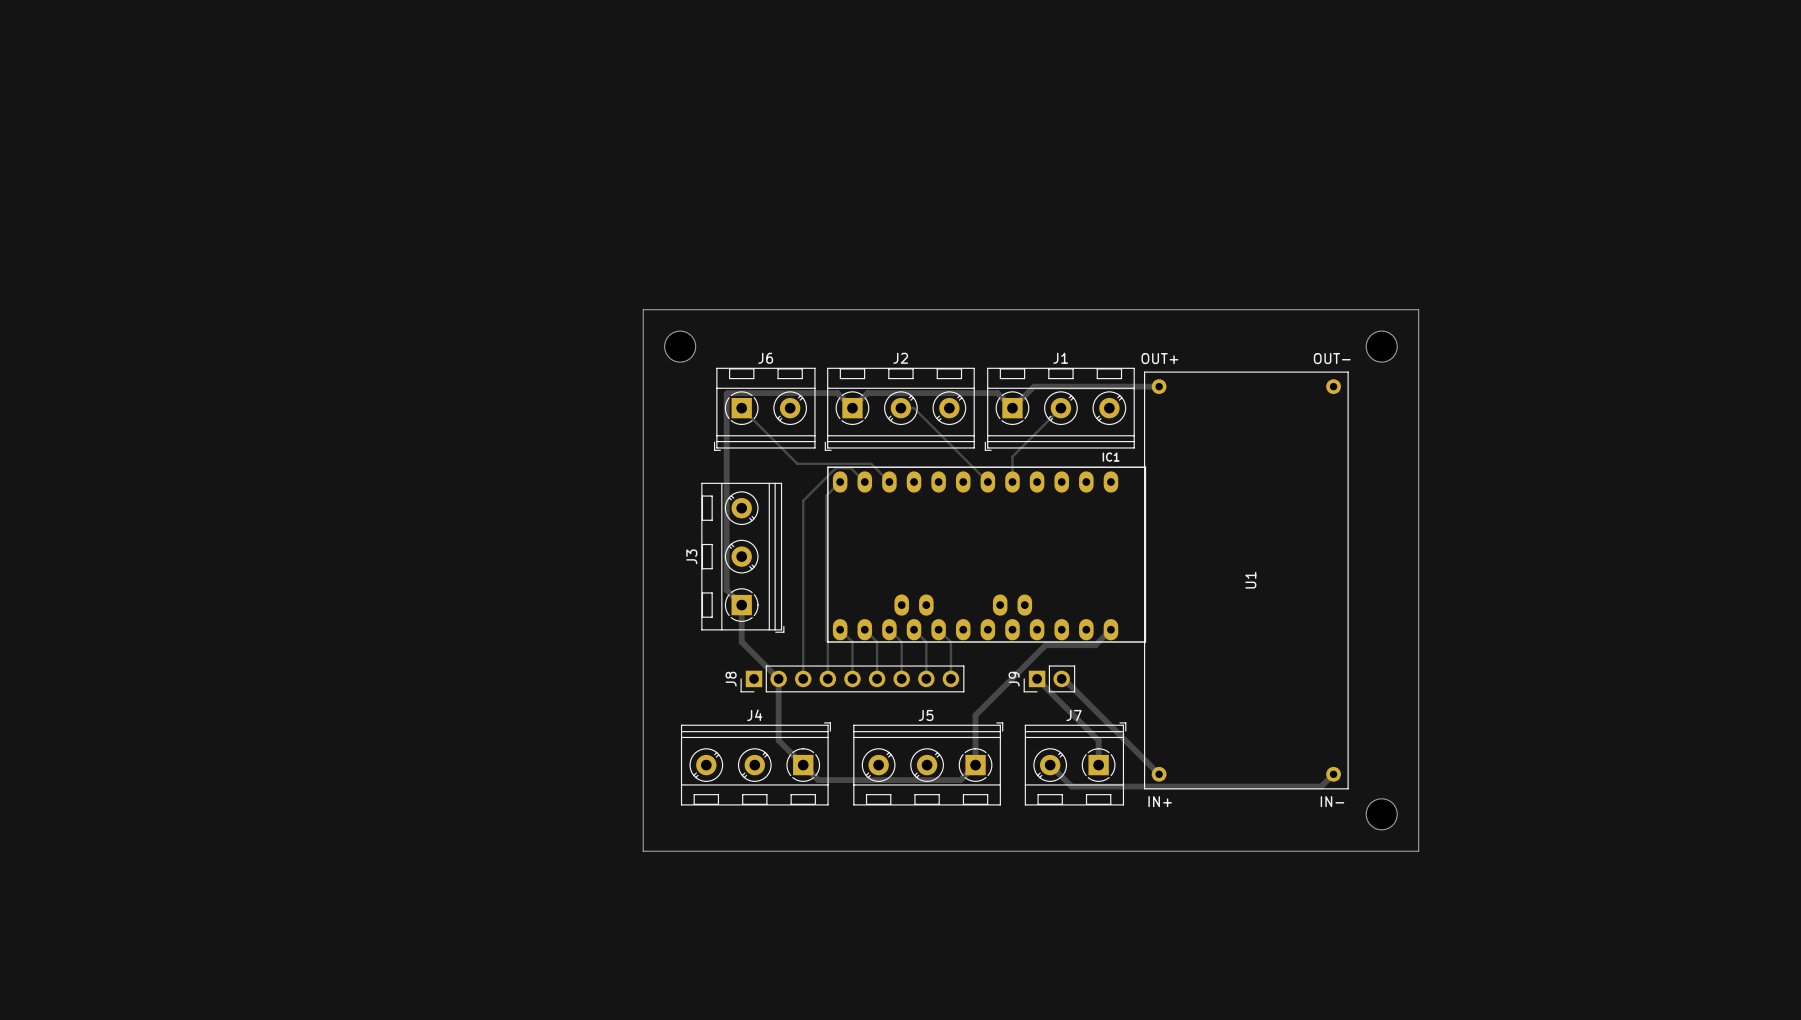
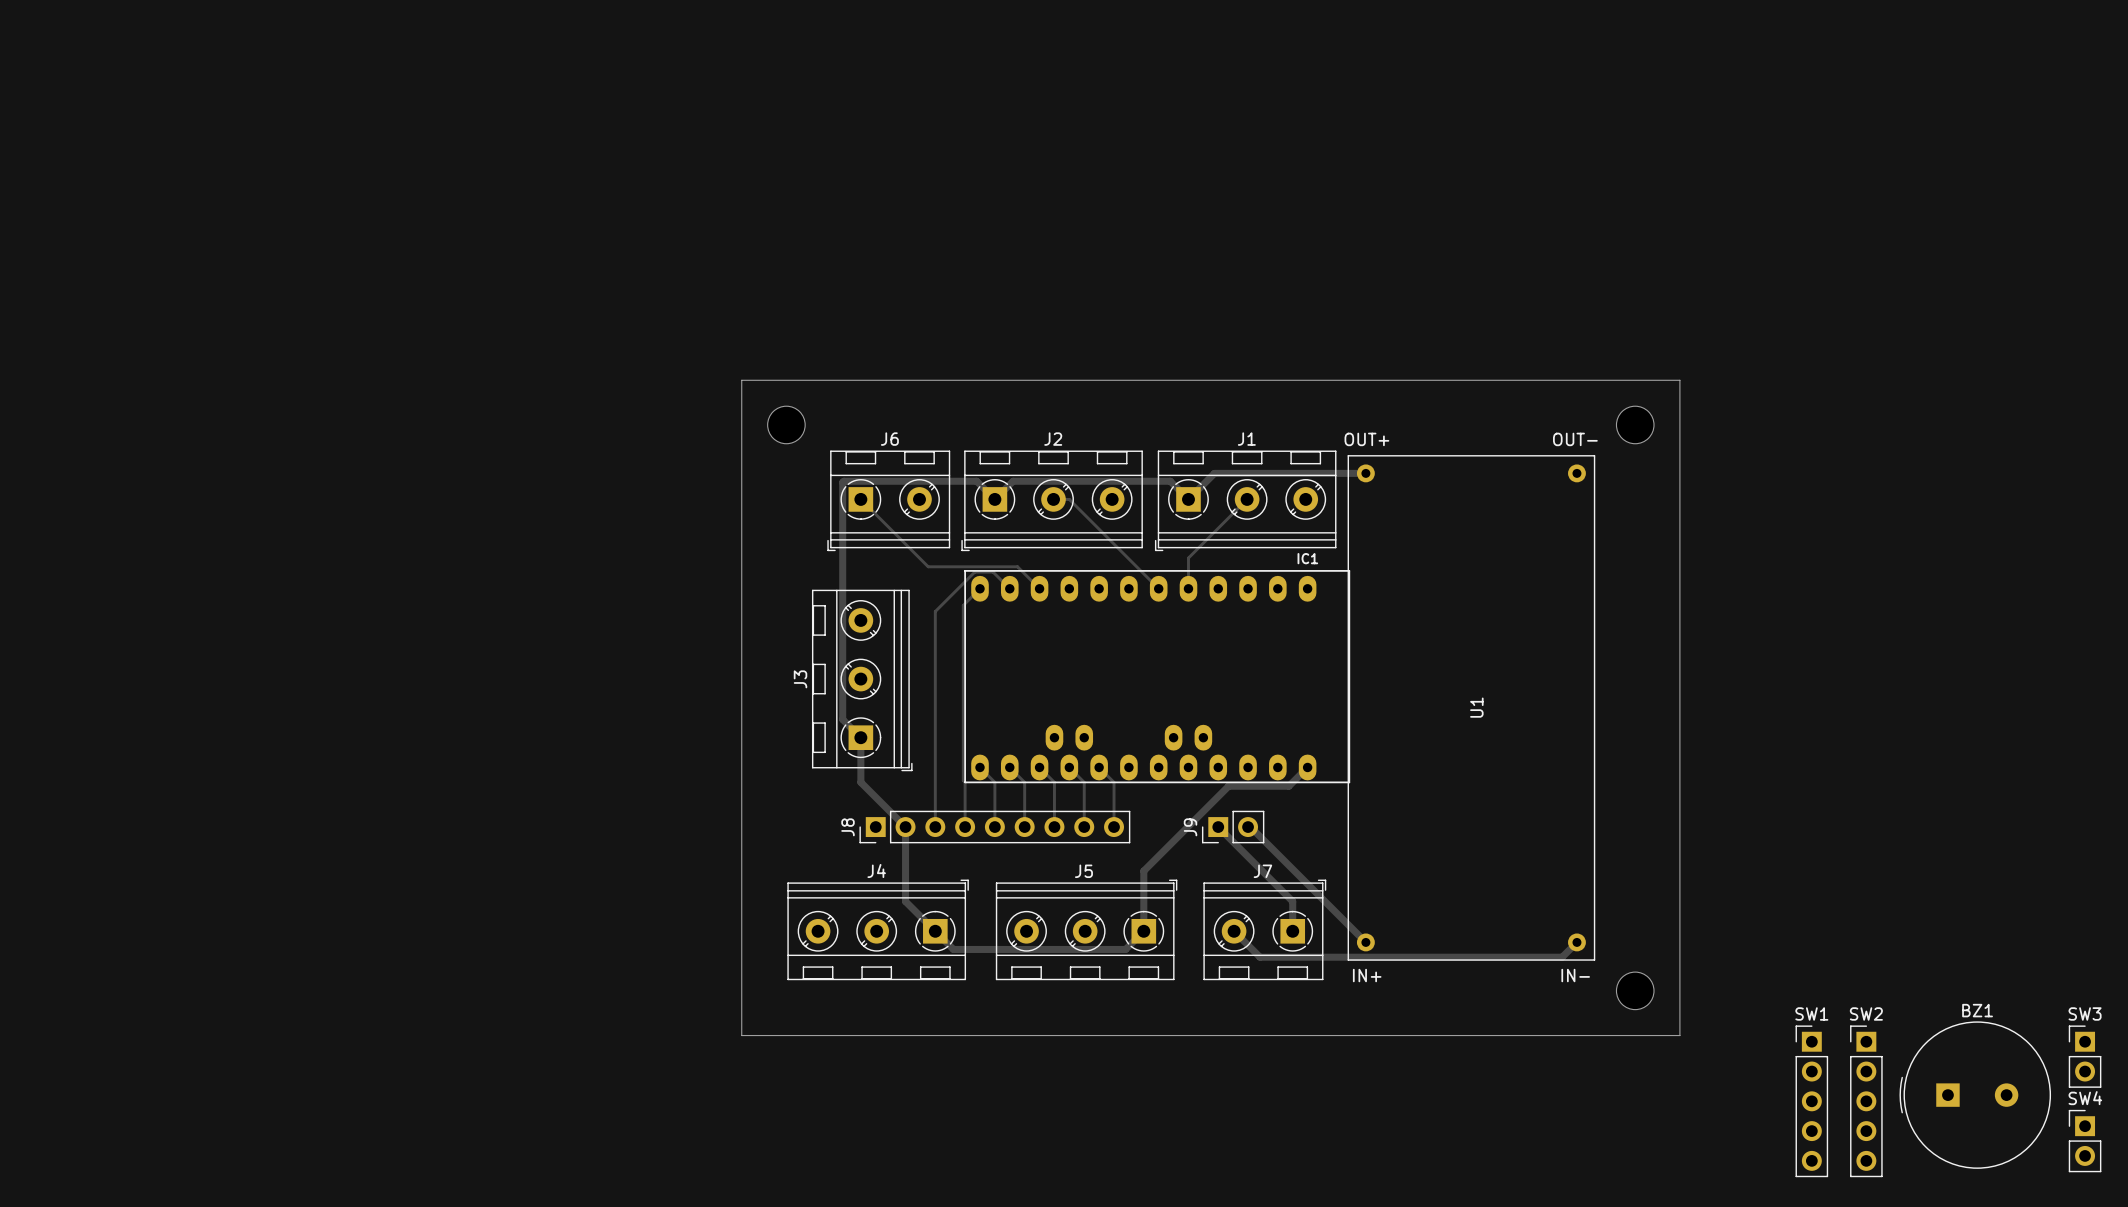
SW3: none -> (2085, 1056)
BZ1: none -> (1975, 1095)
SW1: none -> (1811, 1101)
SW2: none -> (1866, 1101)
SW4: none -> (2085, 1141)

